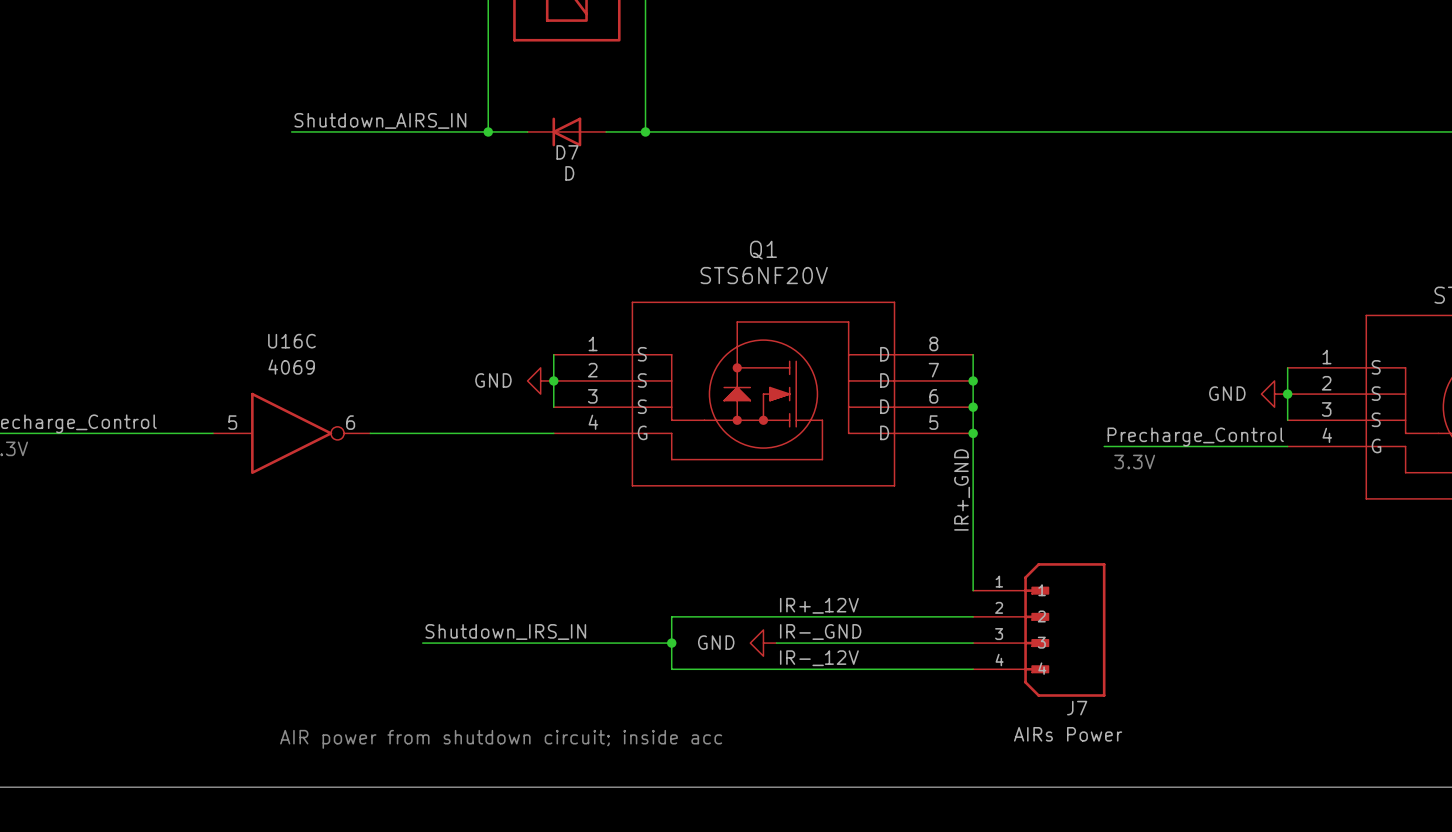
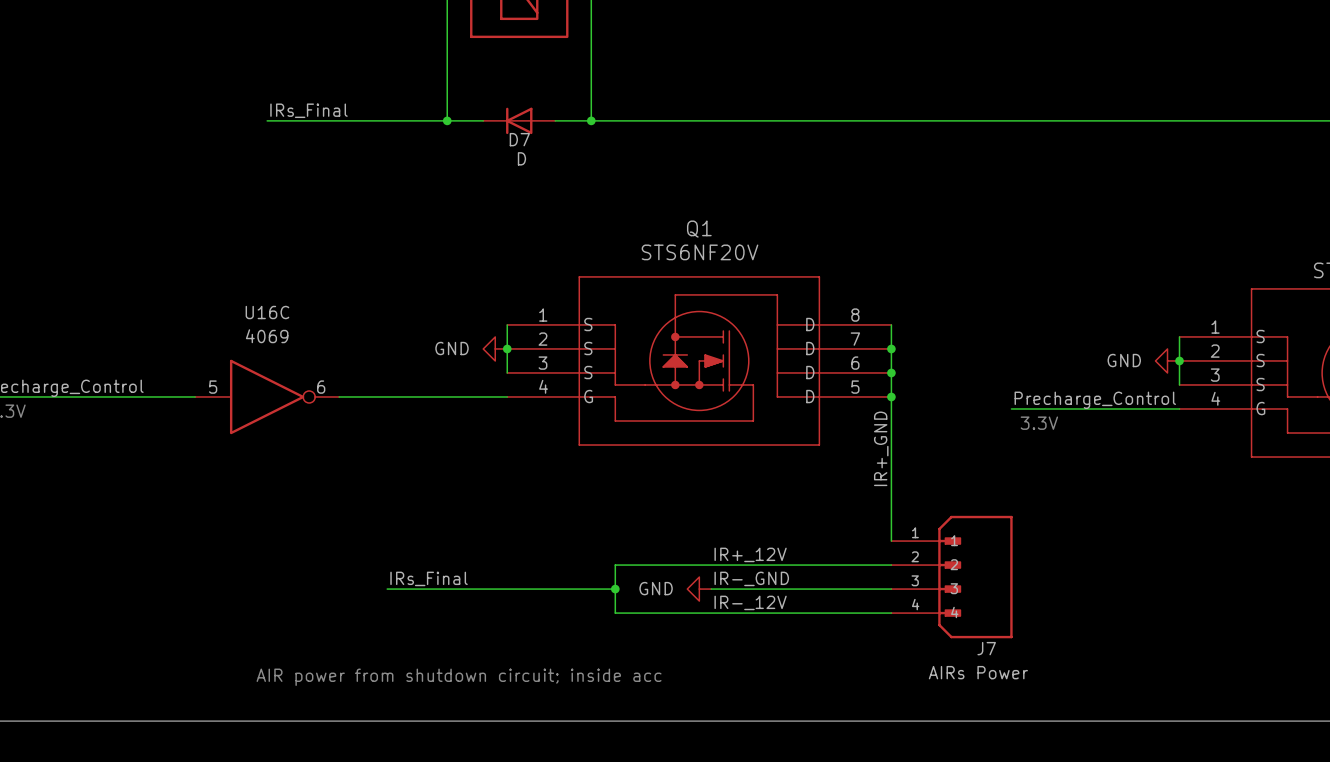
label: Shutdown_AIRS_IN (380, 120) -> IRs_Final (308, 110)
label: Shutdown_IRS_IN (505, 632) -> IRs_Final (429, 578)

